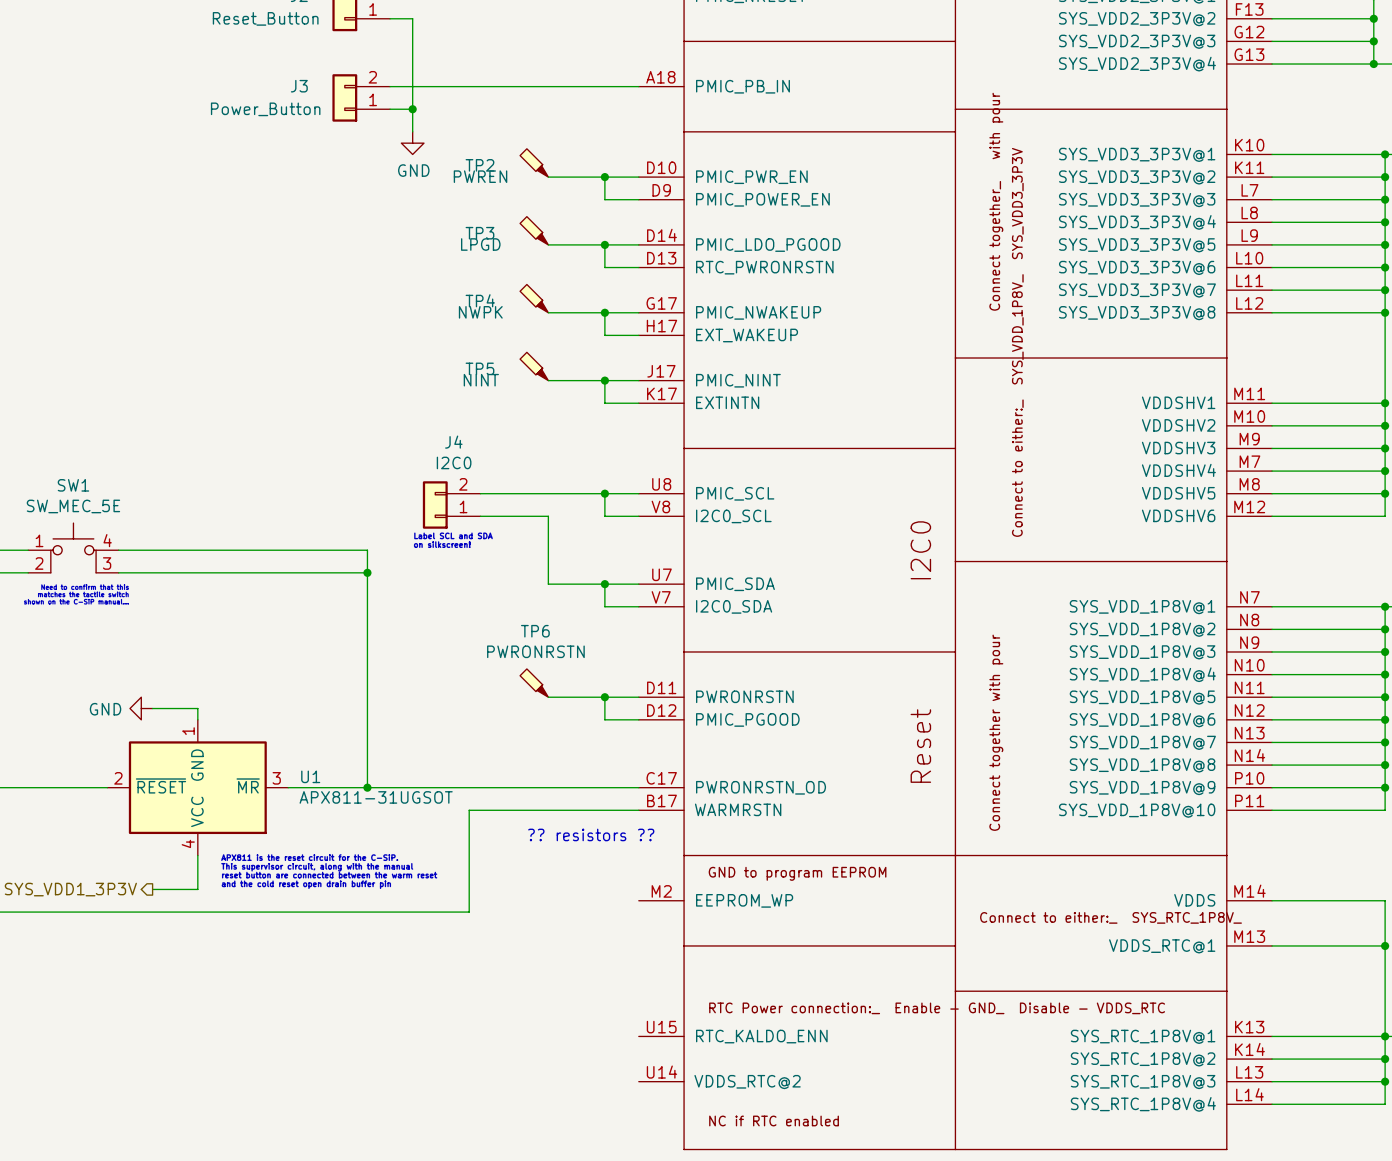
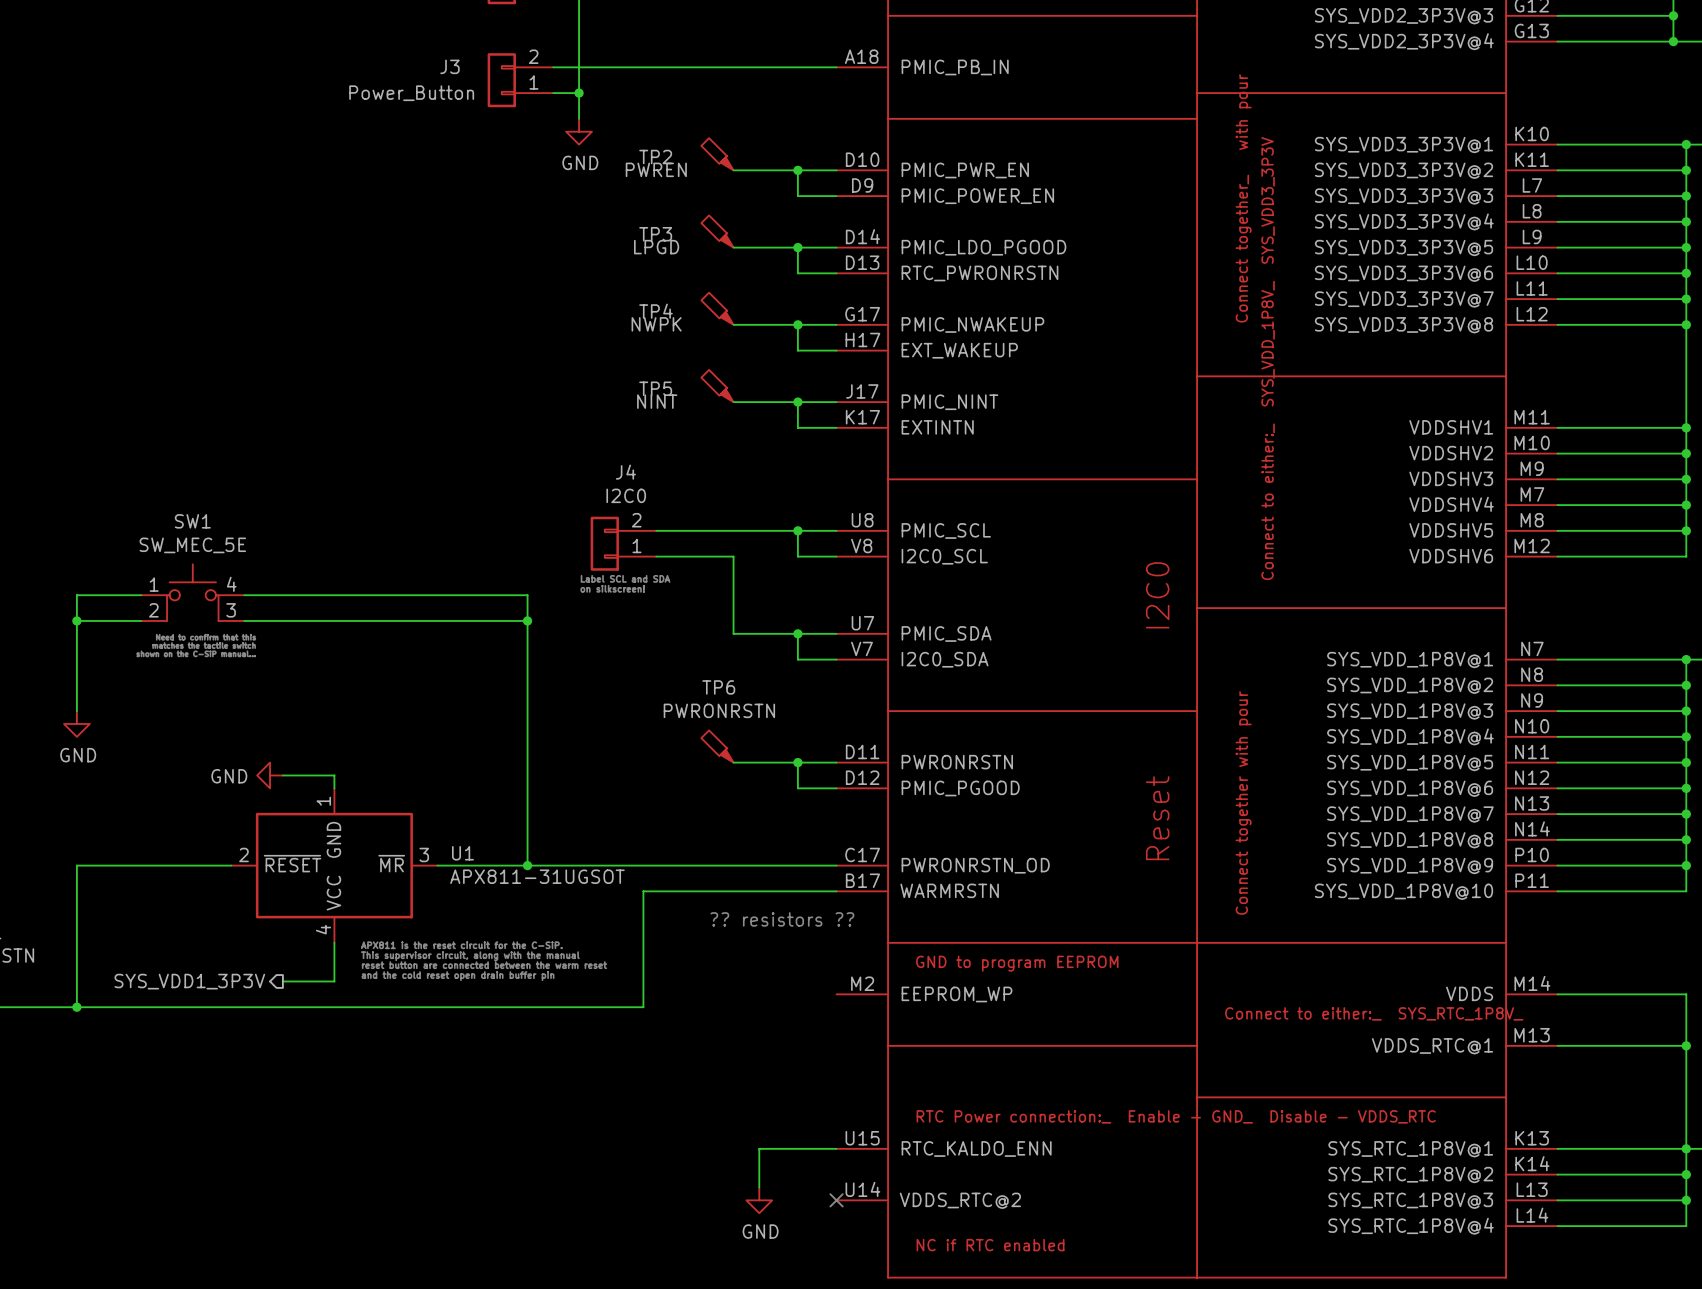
wire: none -> (836, 1148) (759, 1148) (759, 1187)
power symbol: none -> GND (759, 1200)
no-connect mark: none -> (836, 1200)

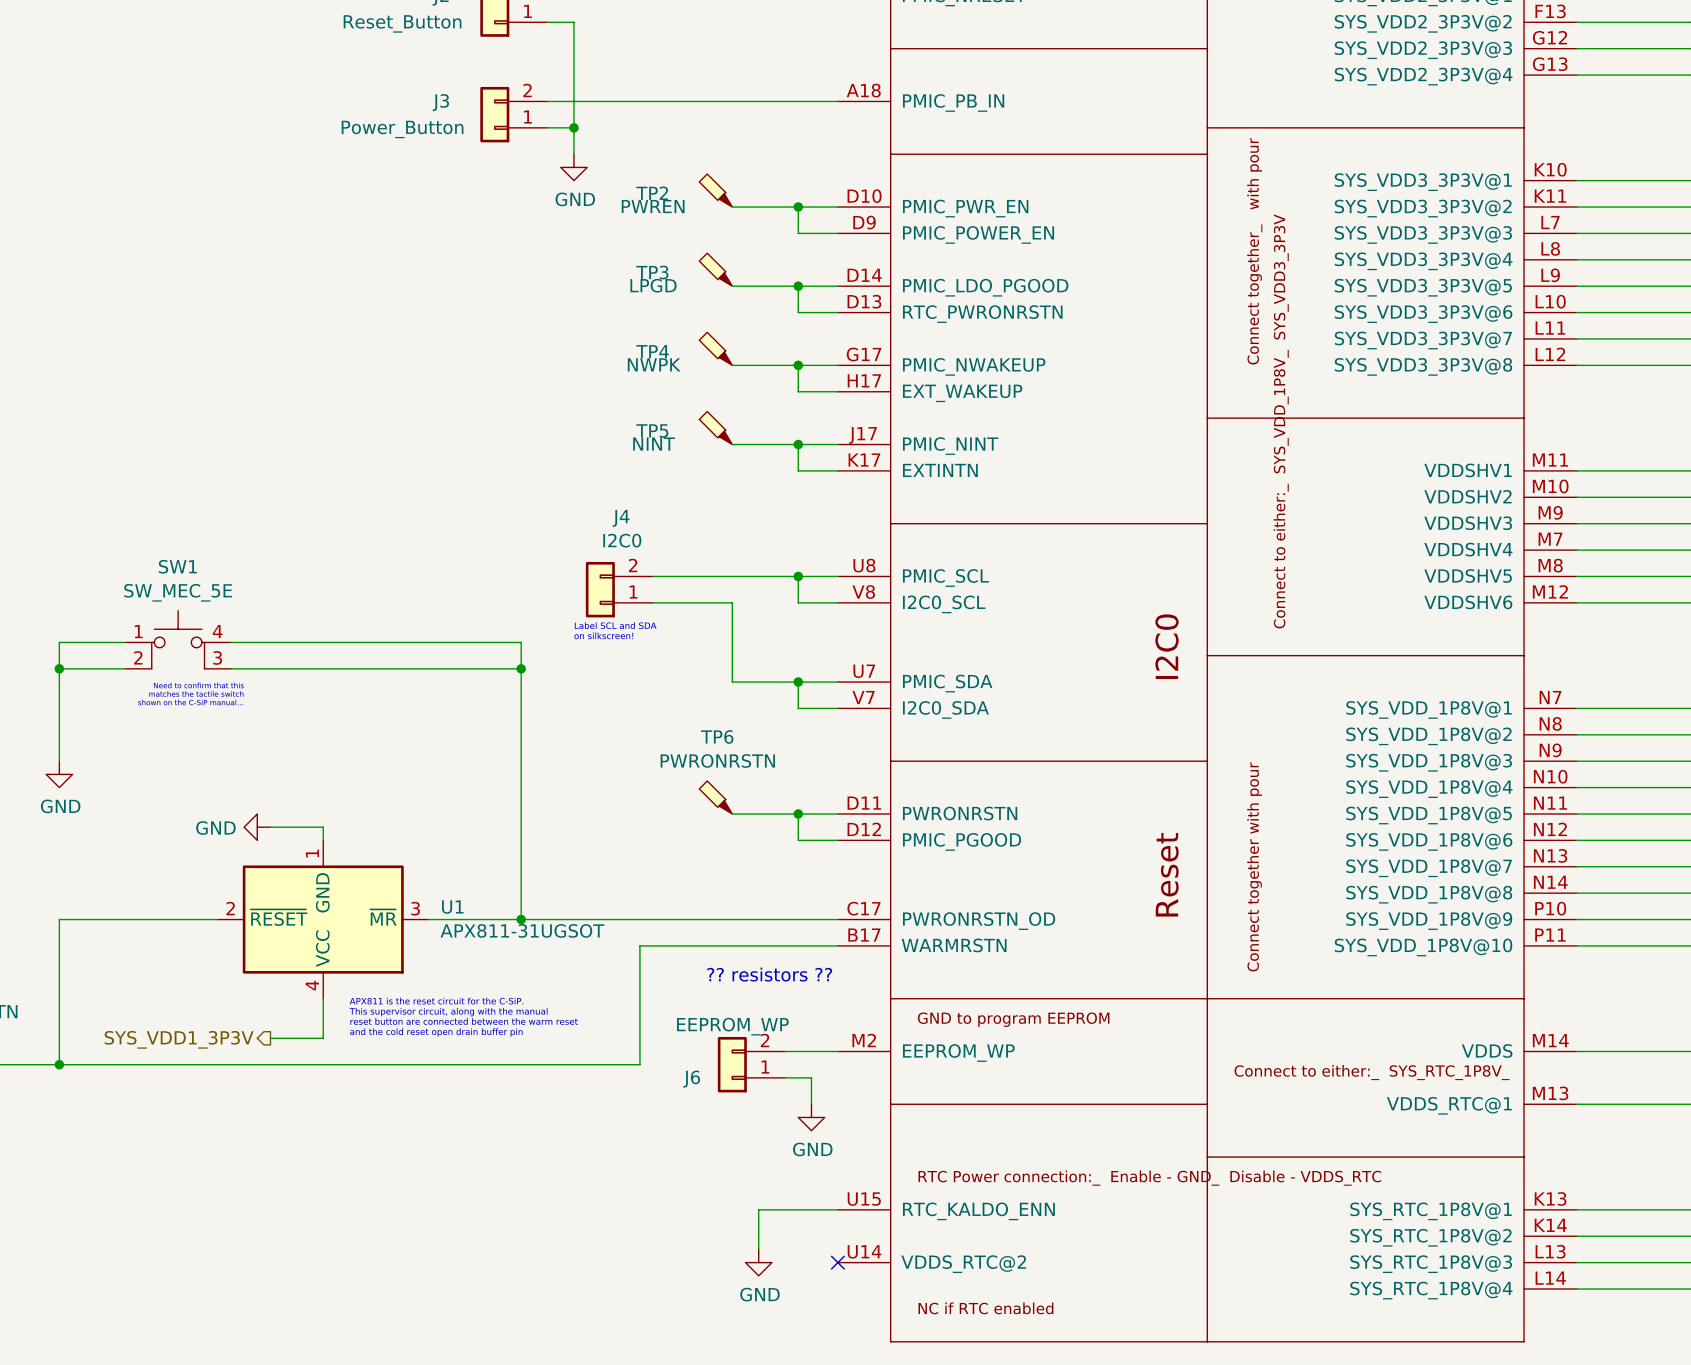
wire: none -> (785, 1051) (837, 1051)
J6: none -> EEPROM_WP (751, 1064)
wire: none -> (785, 1077) (811, 1077) (811, 1104)
power symbol: none -> GND (811, 1117)

